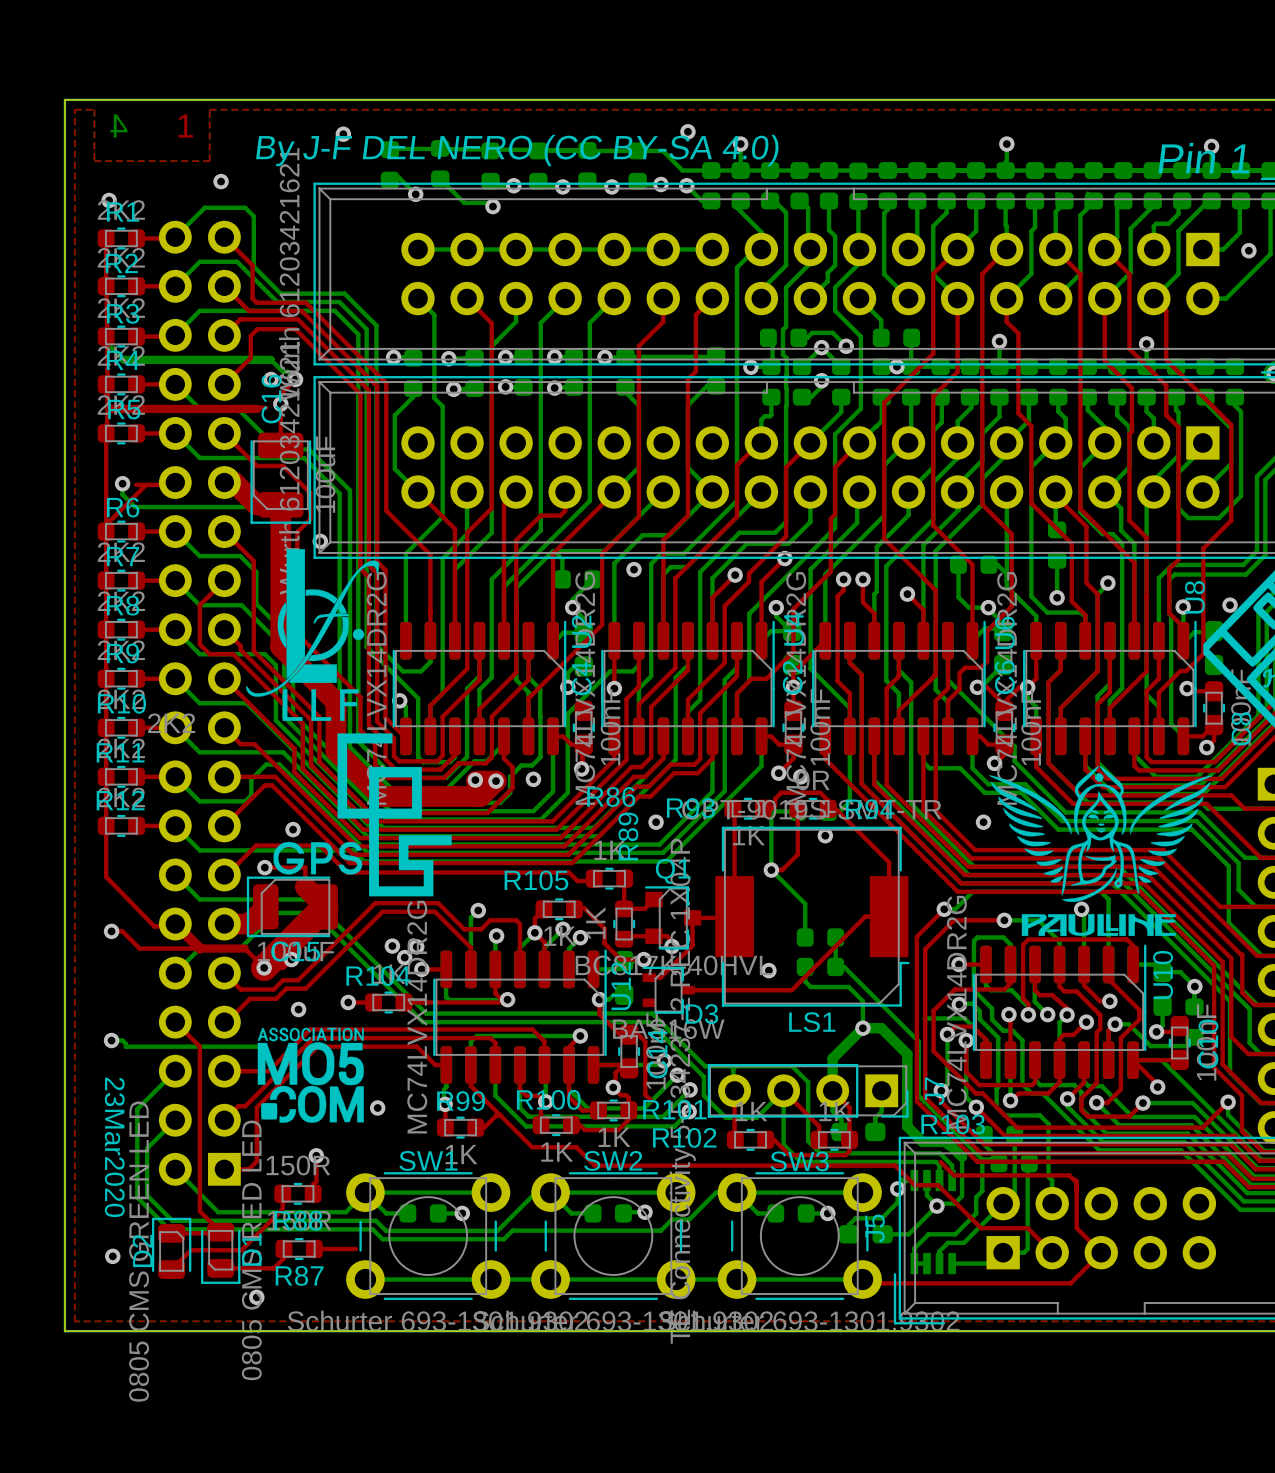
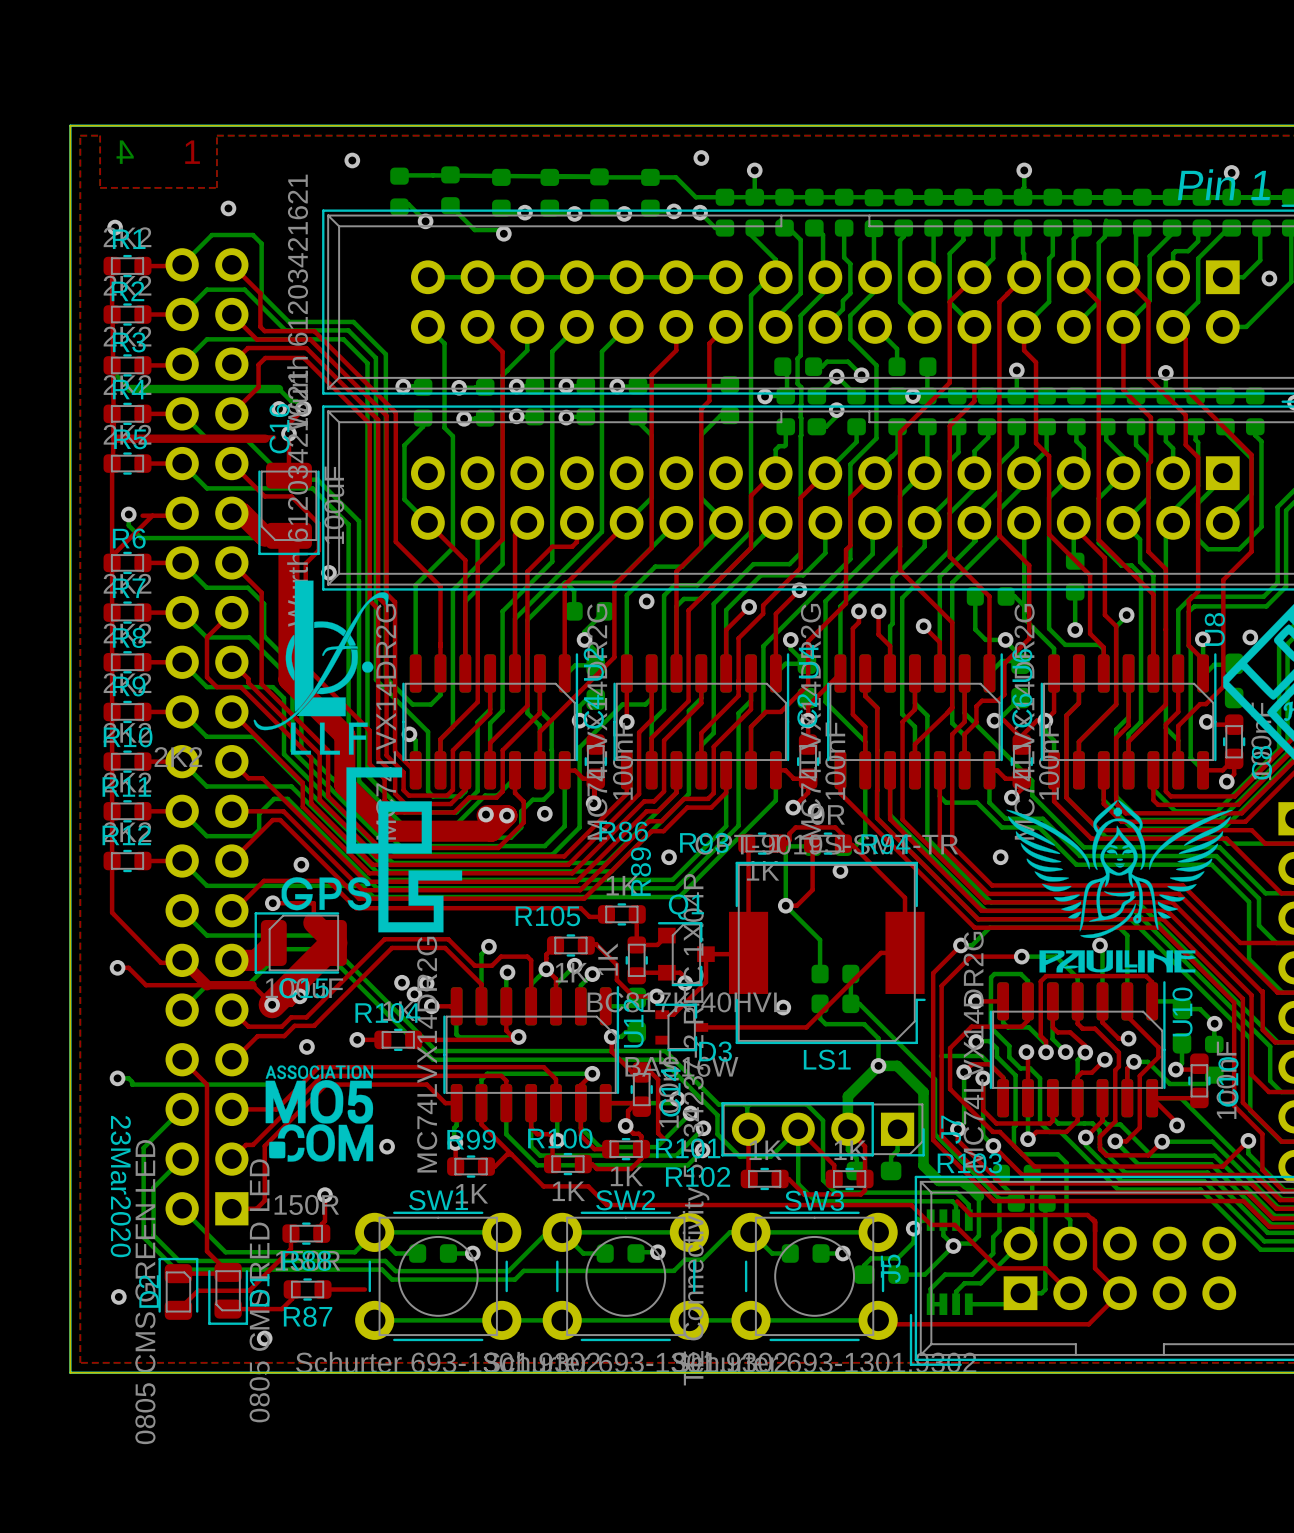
text: By J-F DEL NERO (CC BY-SA 4.0) (517, 150) -> none

